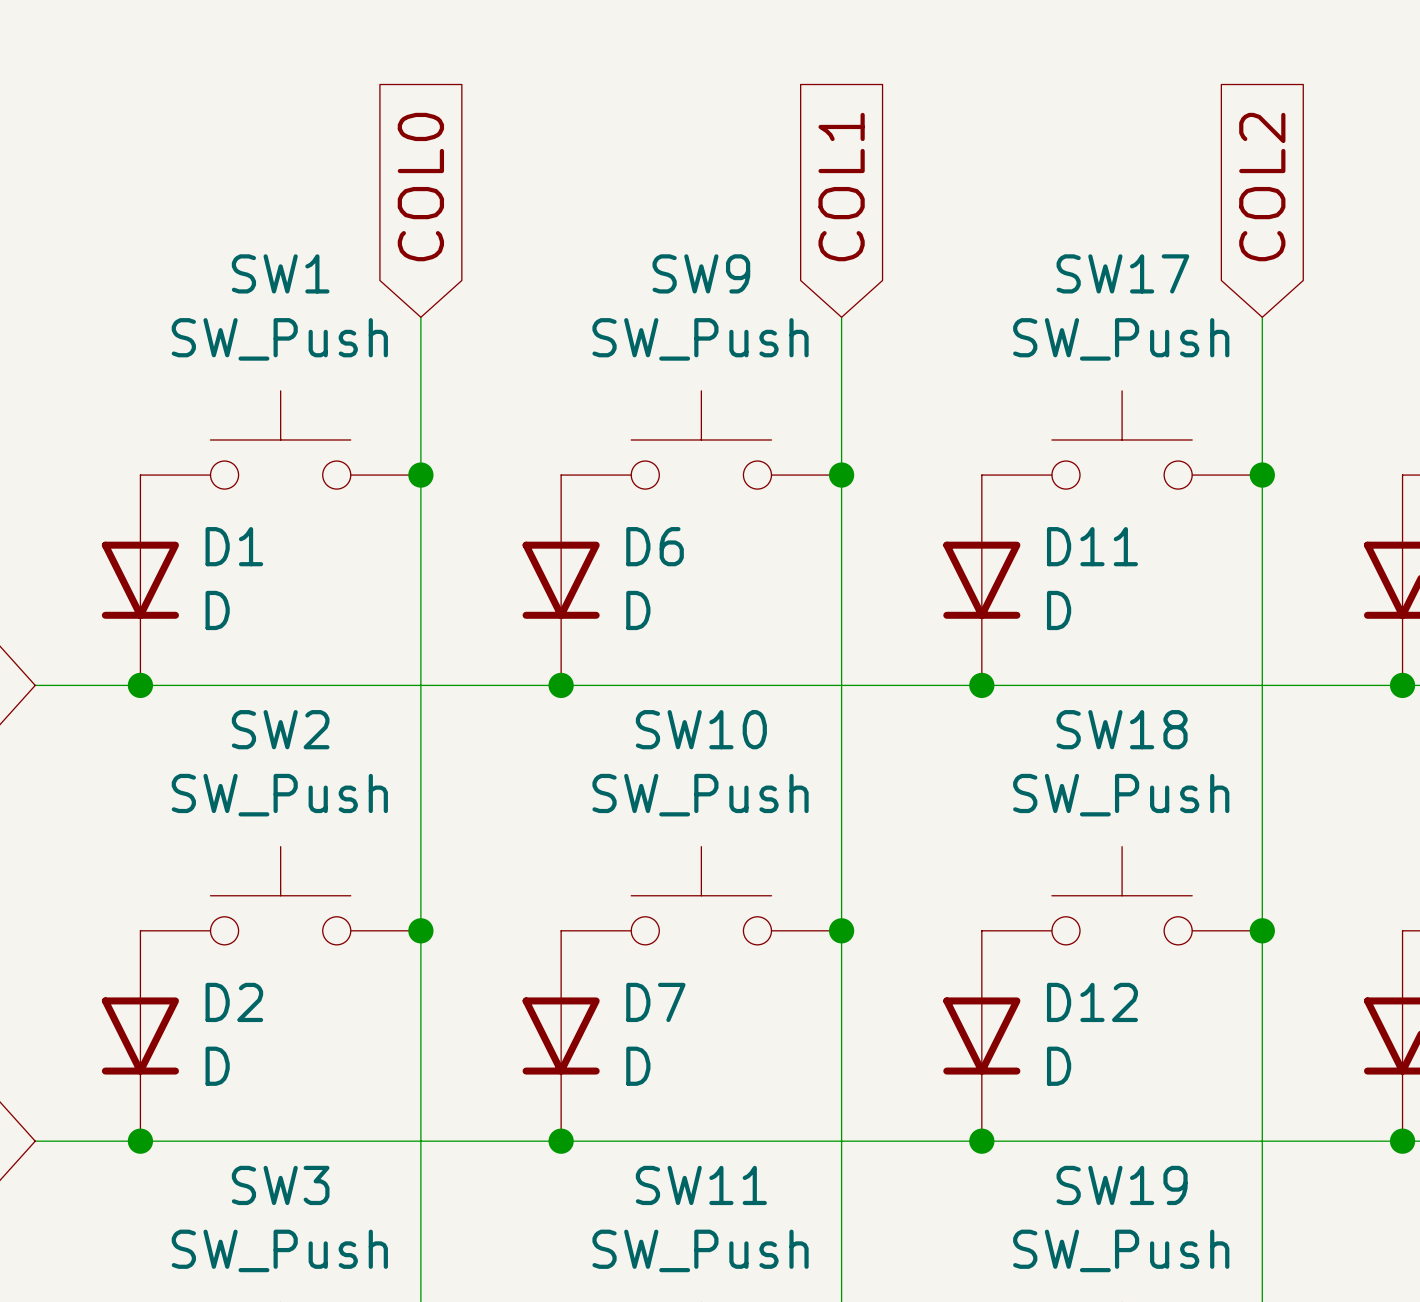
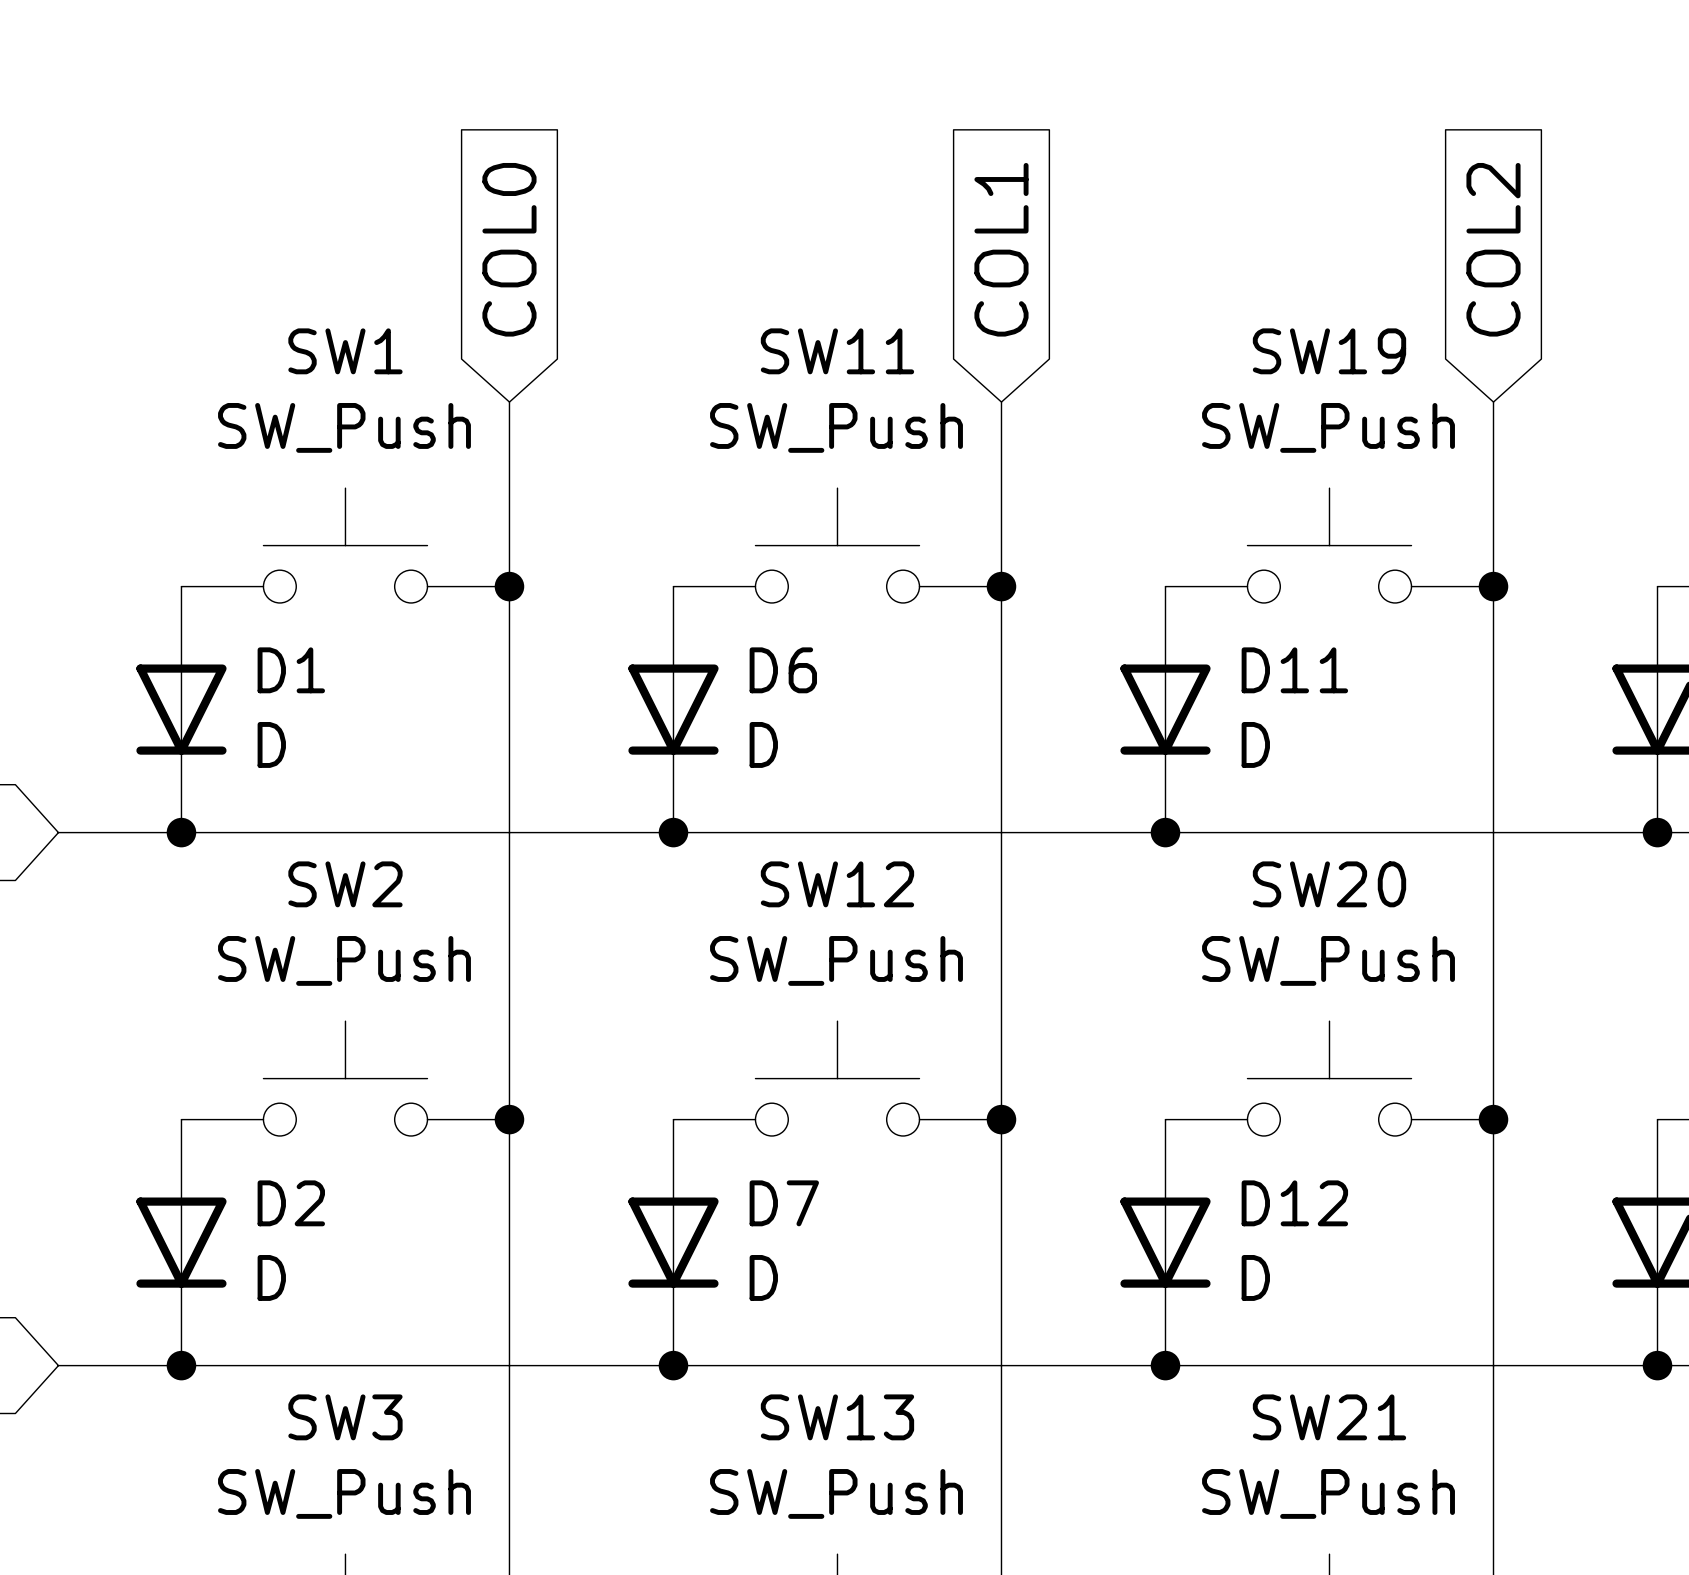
SW9 name: SW9 (701, 273) -> SW11 (837, 351)
SW17 name: SW17 (1122, 273) -> SW19 (1329, 351)
SW10 name: SW10 (701, 729) -> SW12 (837, 884)
SW18 name: SW18 (1122, 729) -> SW20 (1329, 884)
SW11 name: SW11 (701, 1185) -> SW13 (837, 1417)
SW19 name: SW19 (1122, 1185) -> SW21 (1329, 1417)

